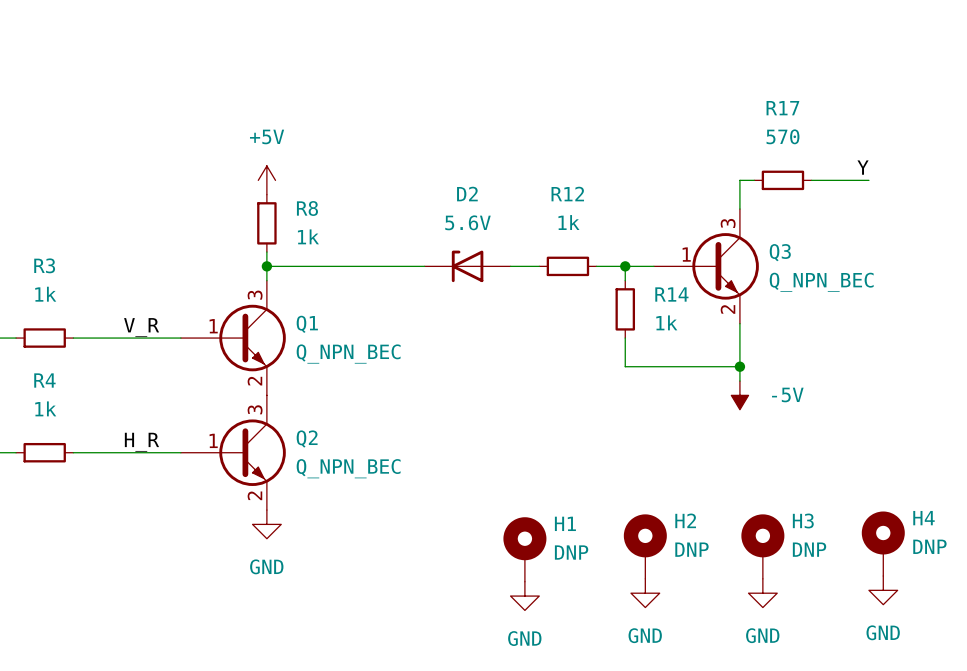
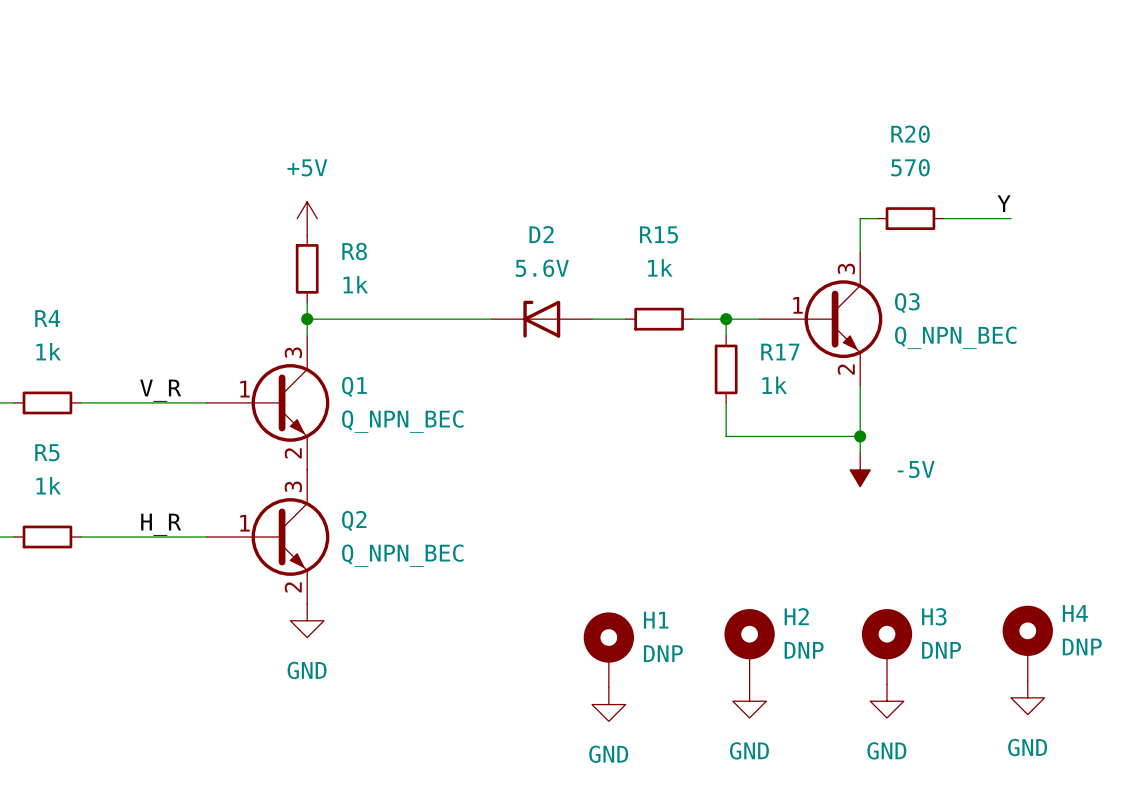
R17 name: R17 (782, 108) -> R20 (910, 134)
R12 name: R12 (567, 194) -> R15 (658, 234)
R3 name: R3 (44, 265) -> R4 (47, 318)
R14 name: R14 (671, 294) -> R17 (780, 352)
R4 name: R4 (44, 380) -> R5 (47, 452)

